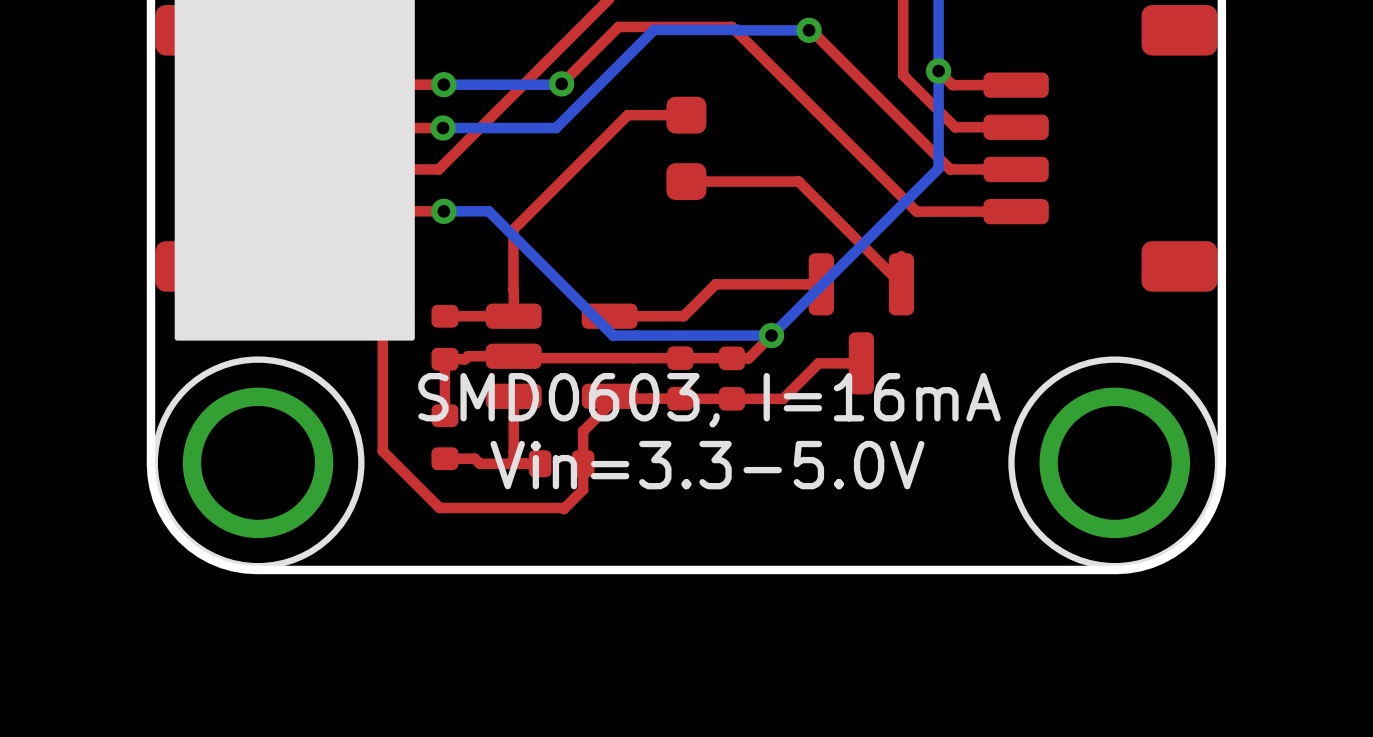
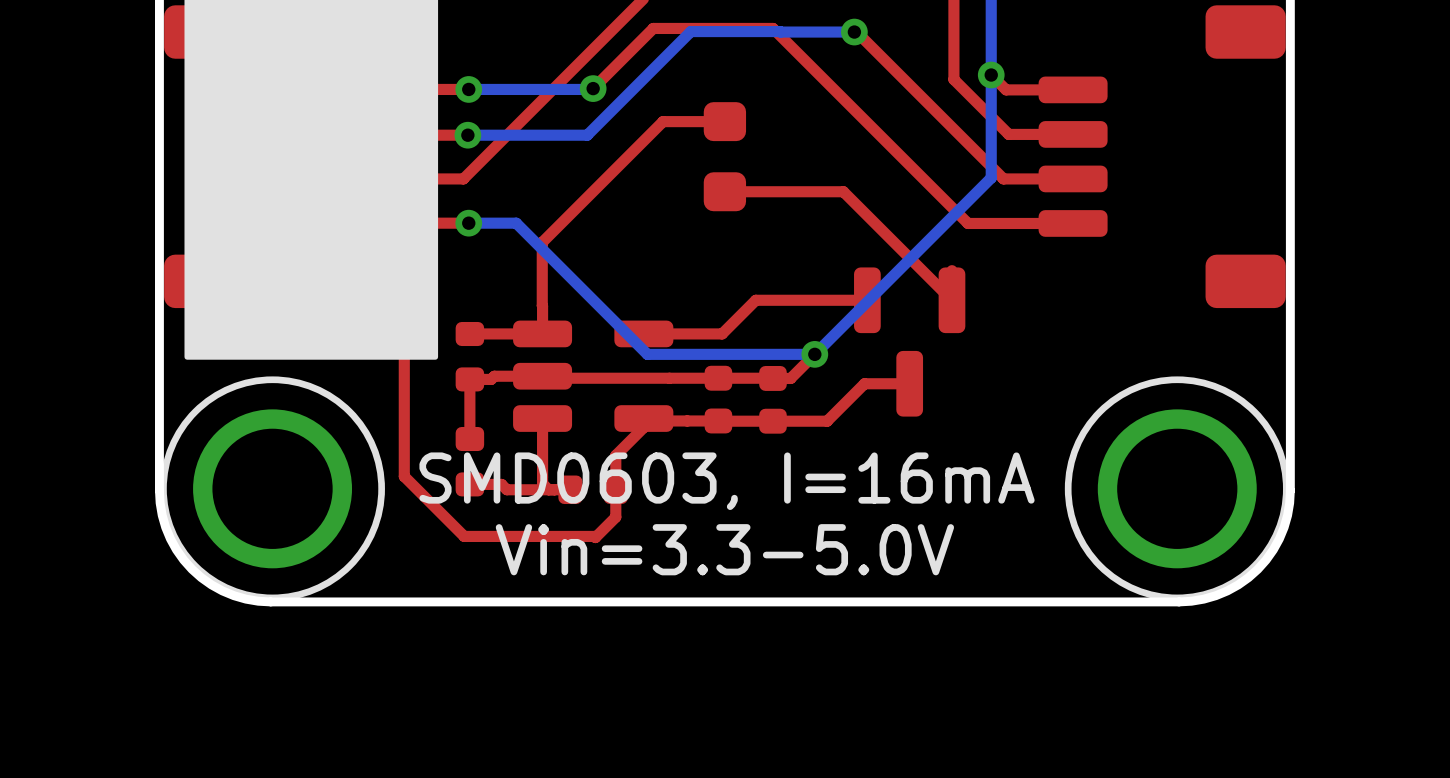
text position: SMD0603, I=16mA (709, 400) -> SMD0603, I=16mA (727, 481)
text position: Vin=3.3-5.0V (707, 465) -> Vin=3.3-5.0V (724, 549)

